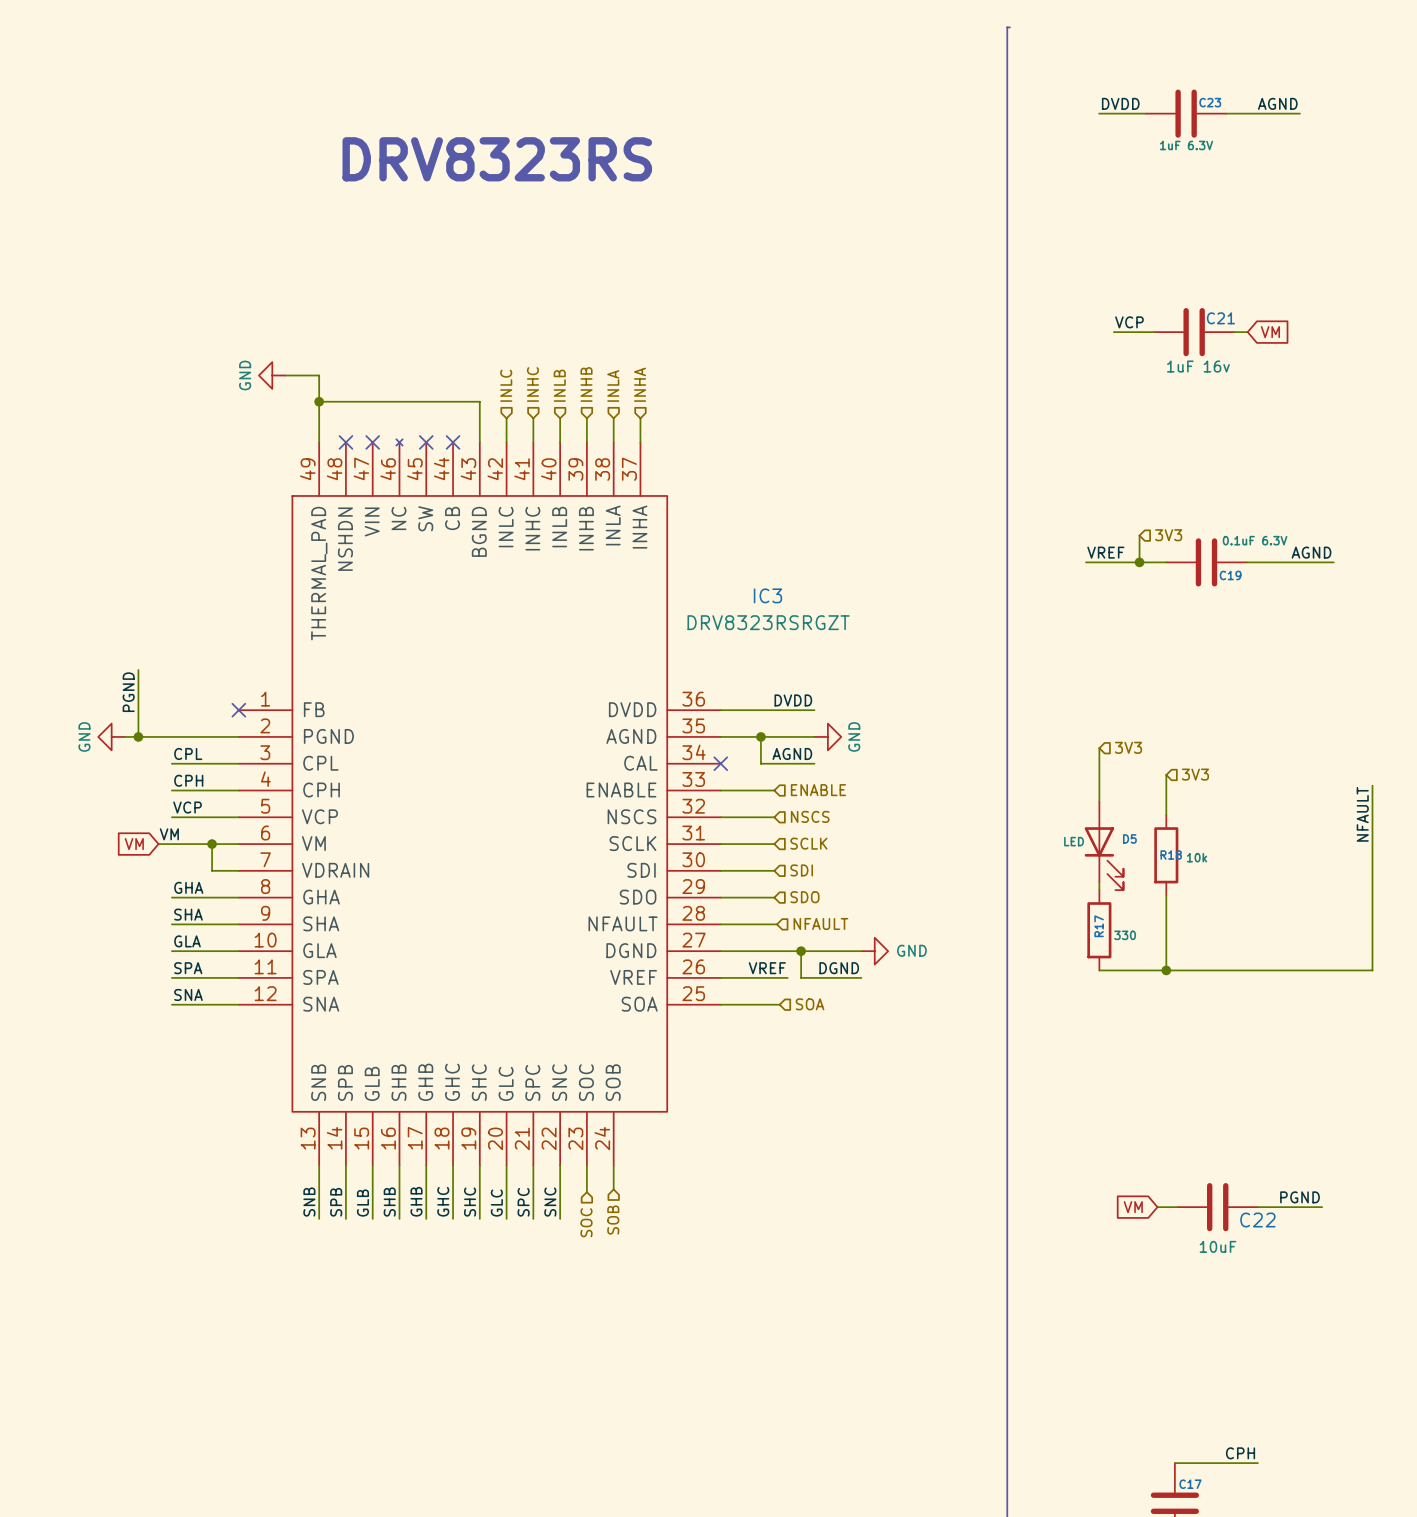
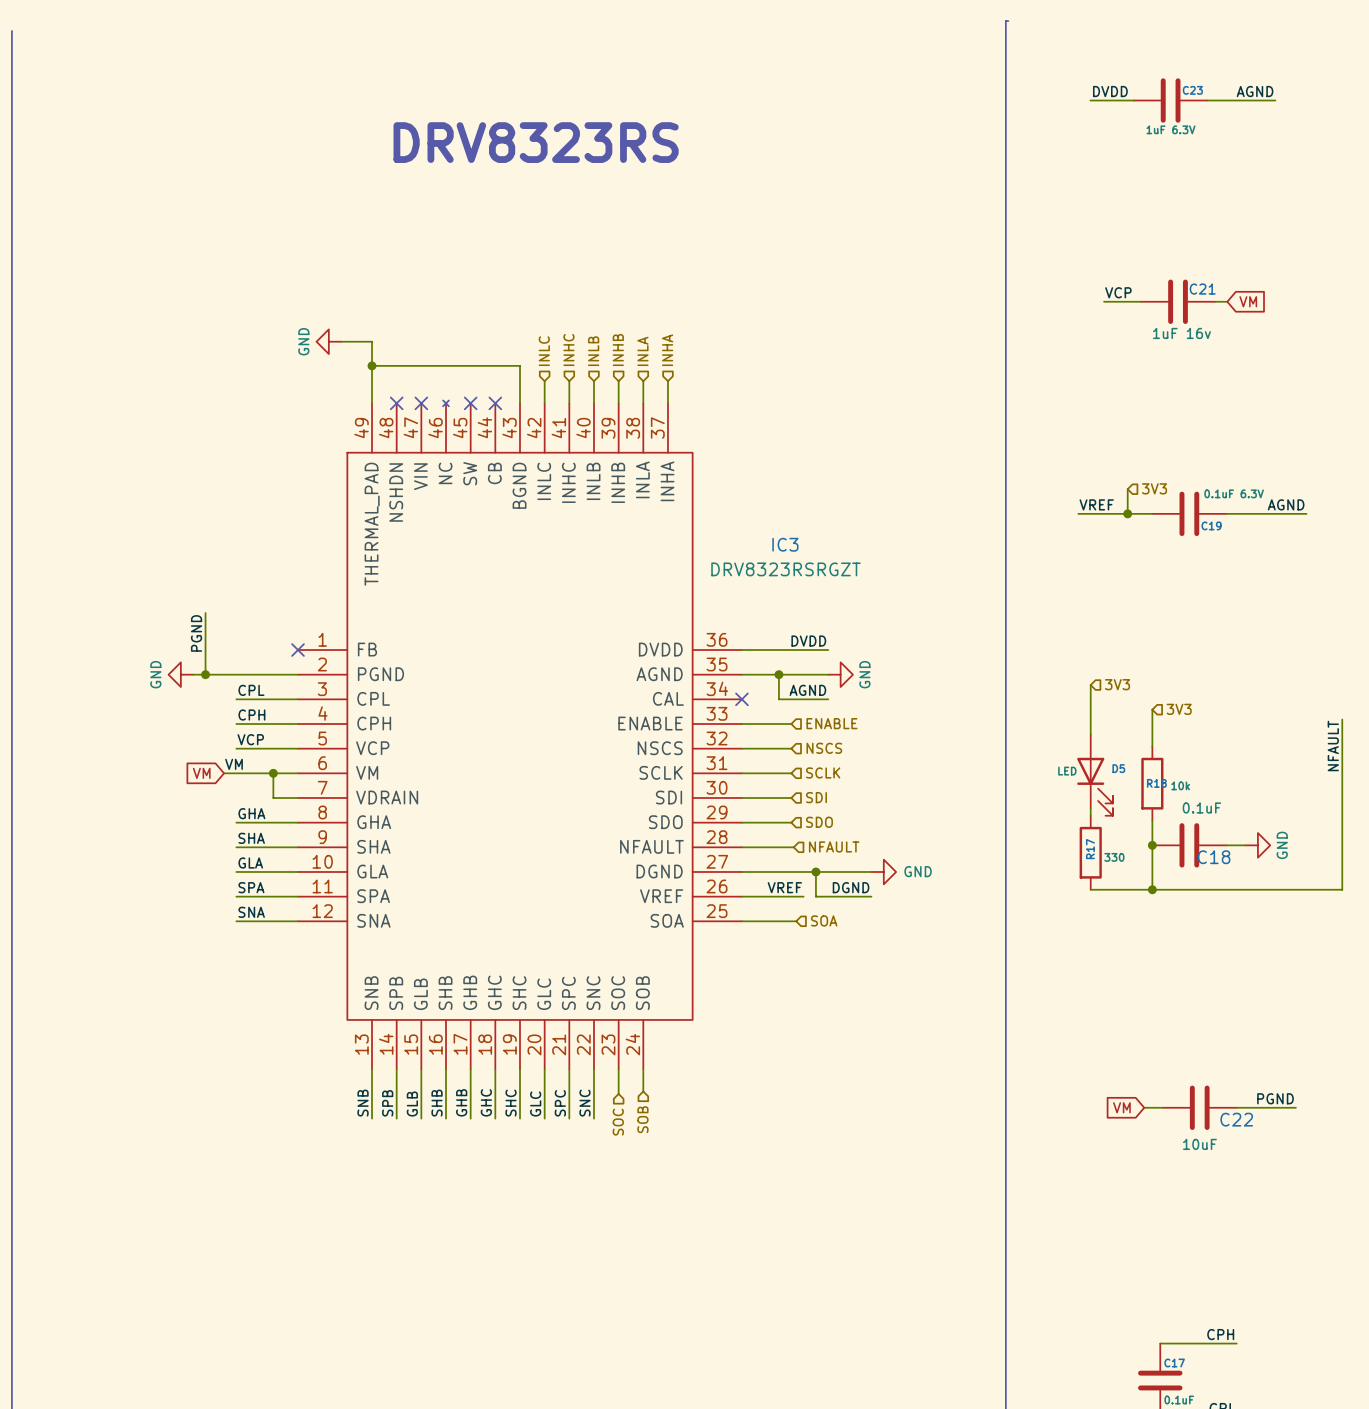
junction: none -> (1152, 845)
C18: none -> 0.1uF (1189, 845)
wire: none -> (1226, 845) (1245, 845)
power symbol: none -> GND (1257, 845)

